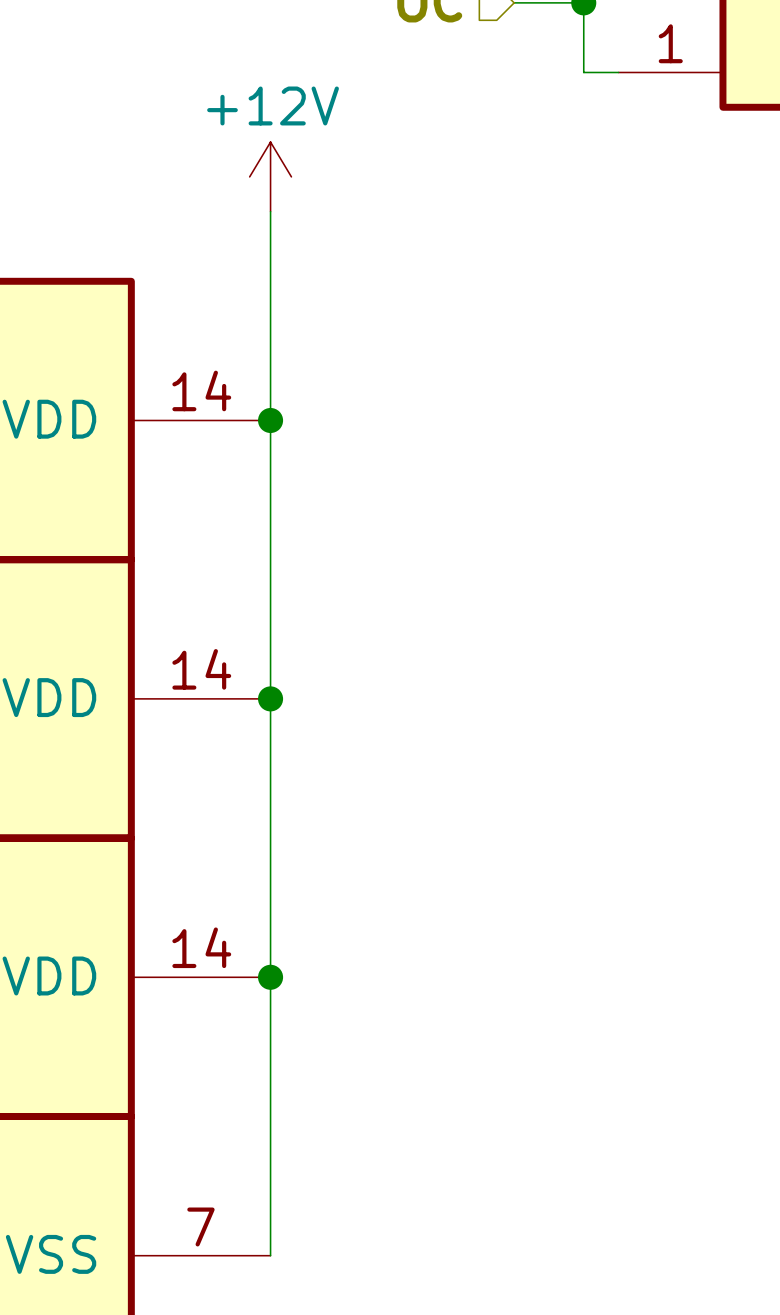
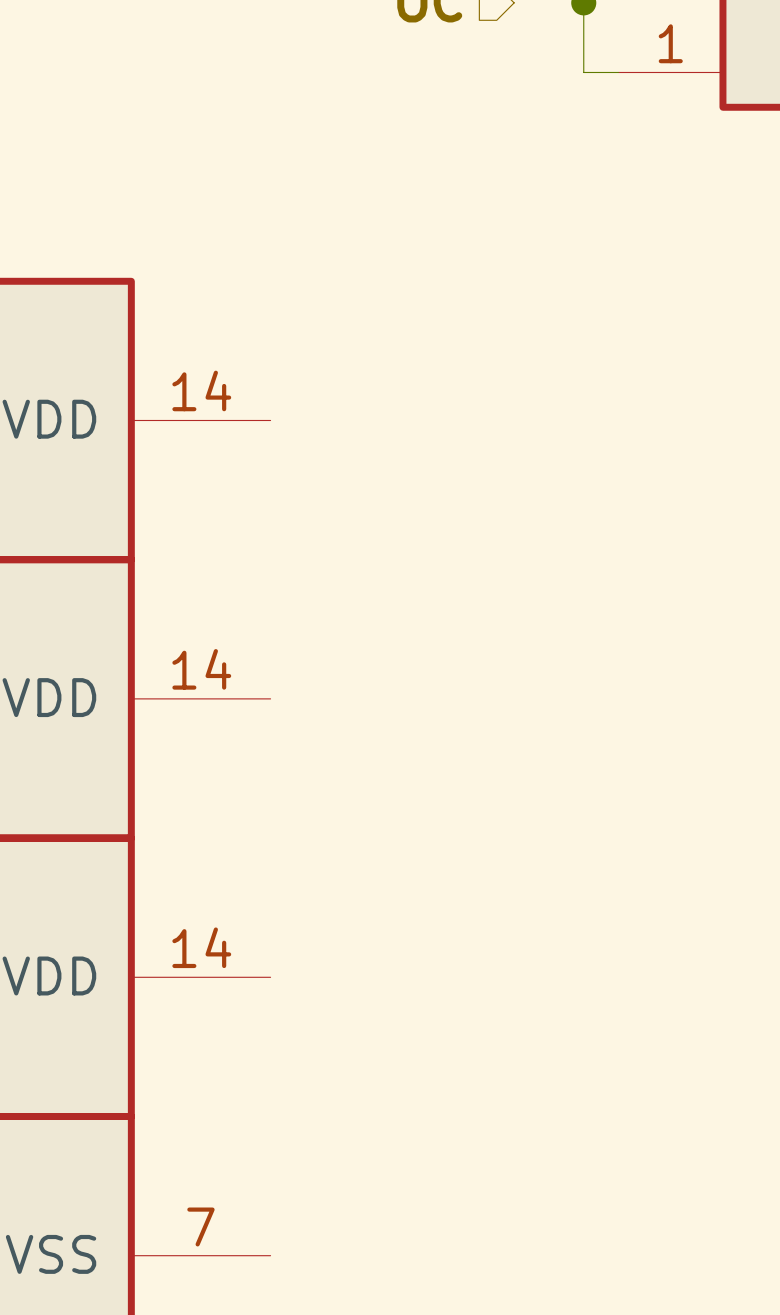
wire: (514, 2) (583, 2) -> none
power symbol: +12V (270, 176) -> none
wire: (270, 211) (270, 1255) -> none
junction: (270, 420) -> none
junction: (270, 698) -> none
junction: (270, 977) -> none

